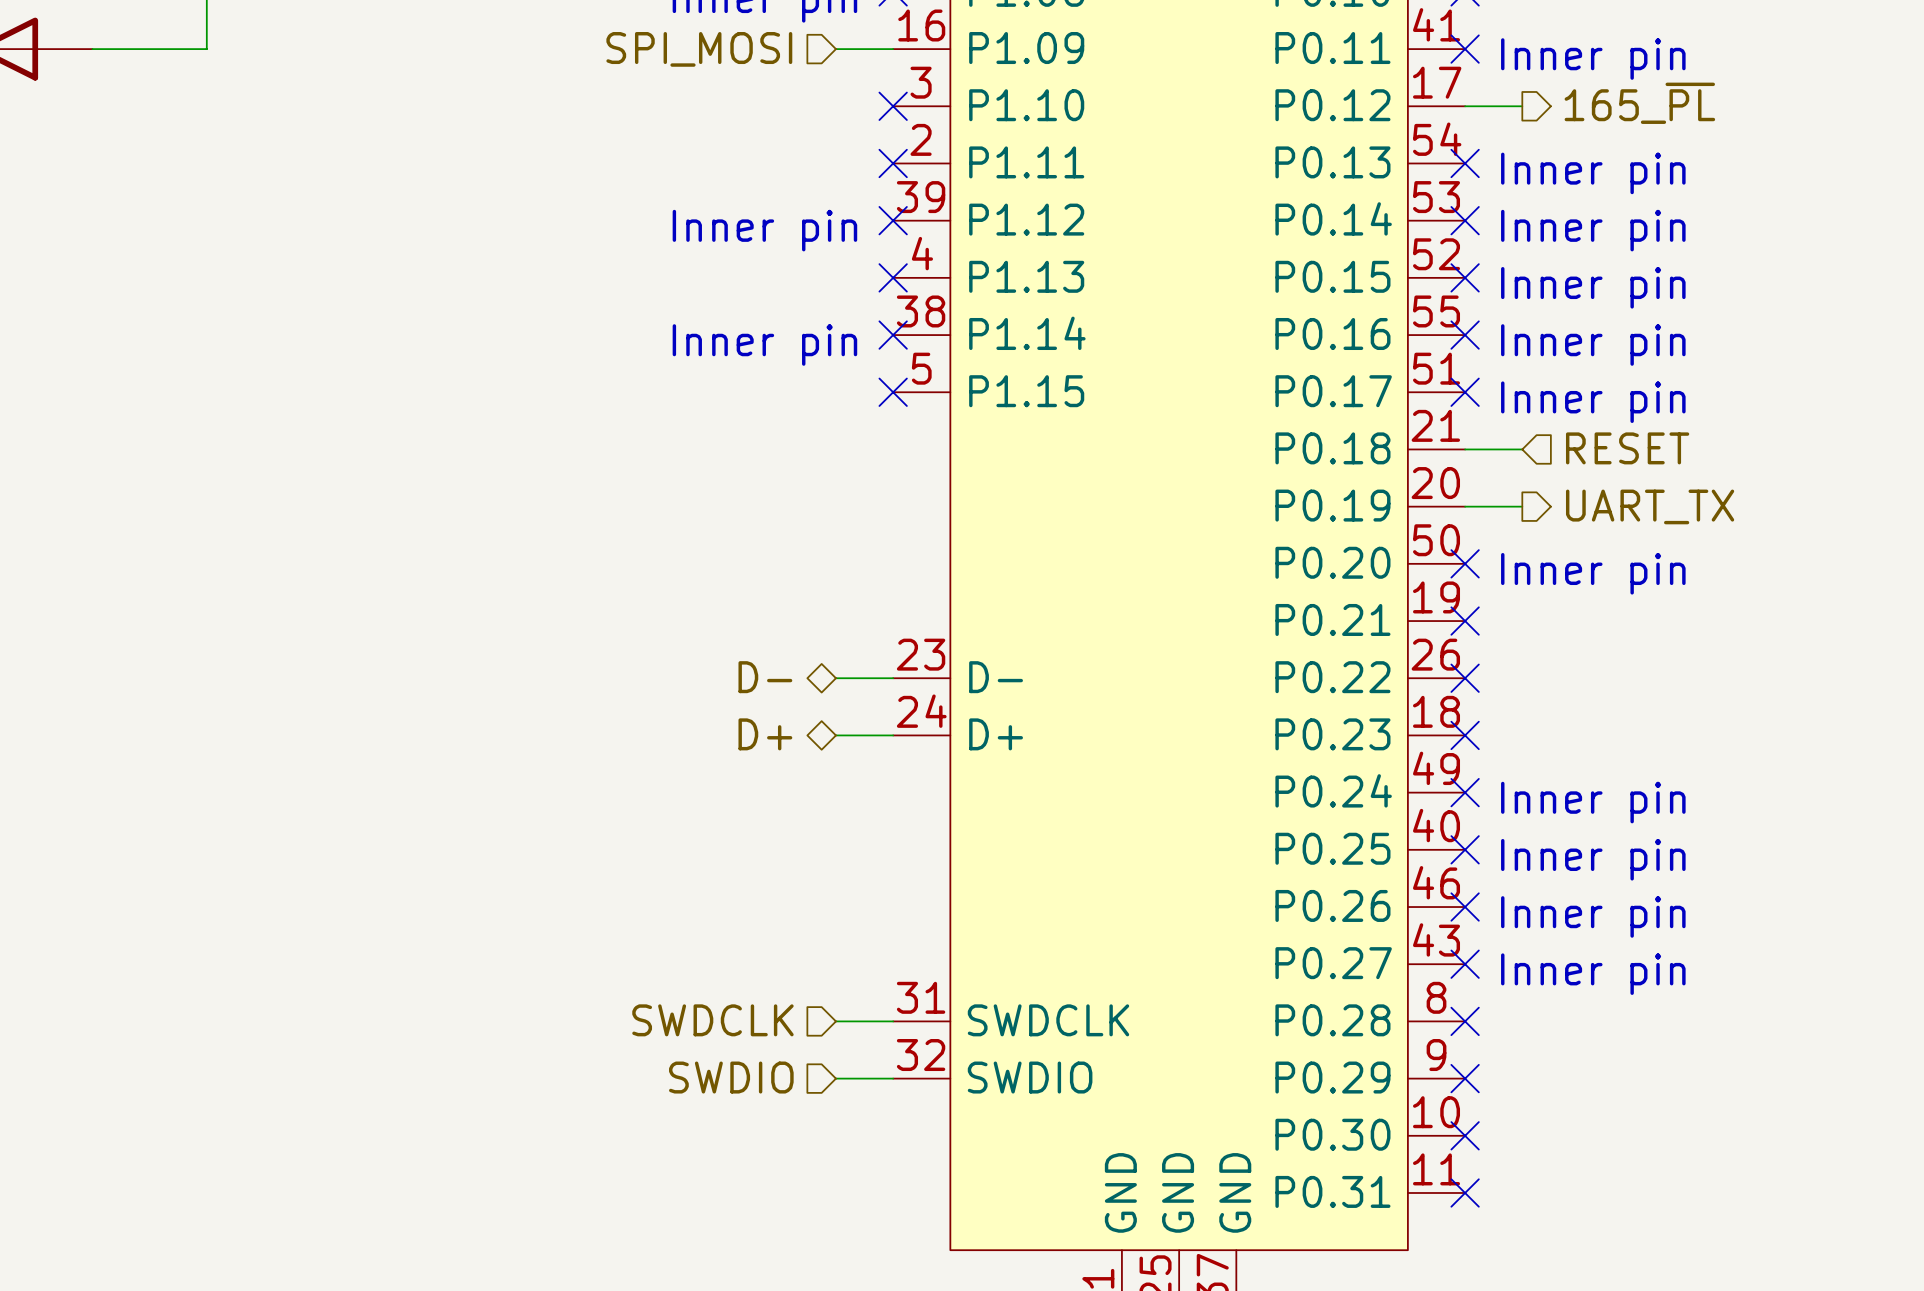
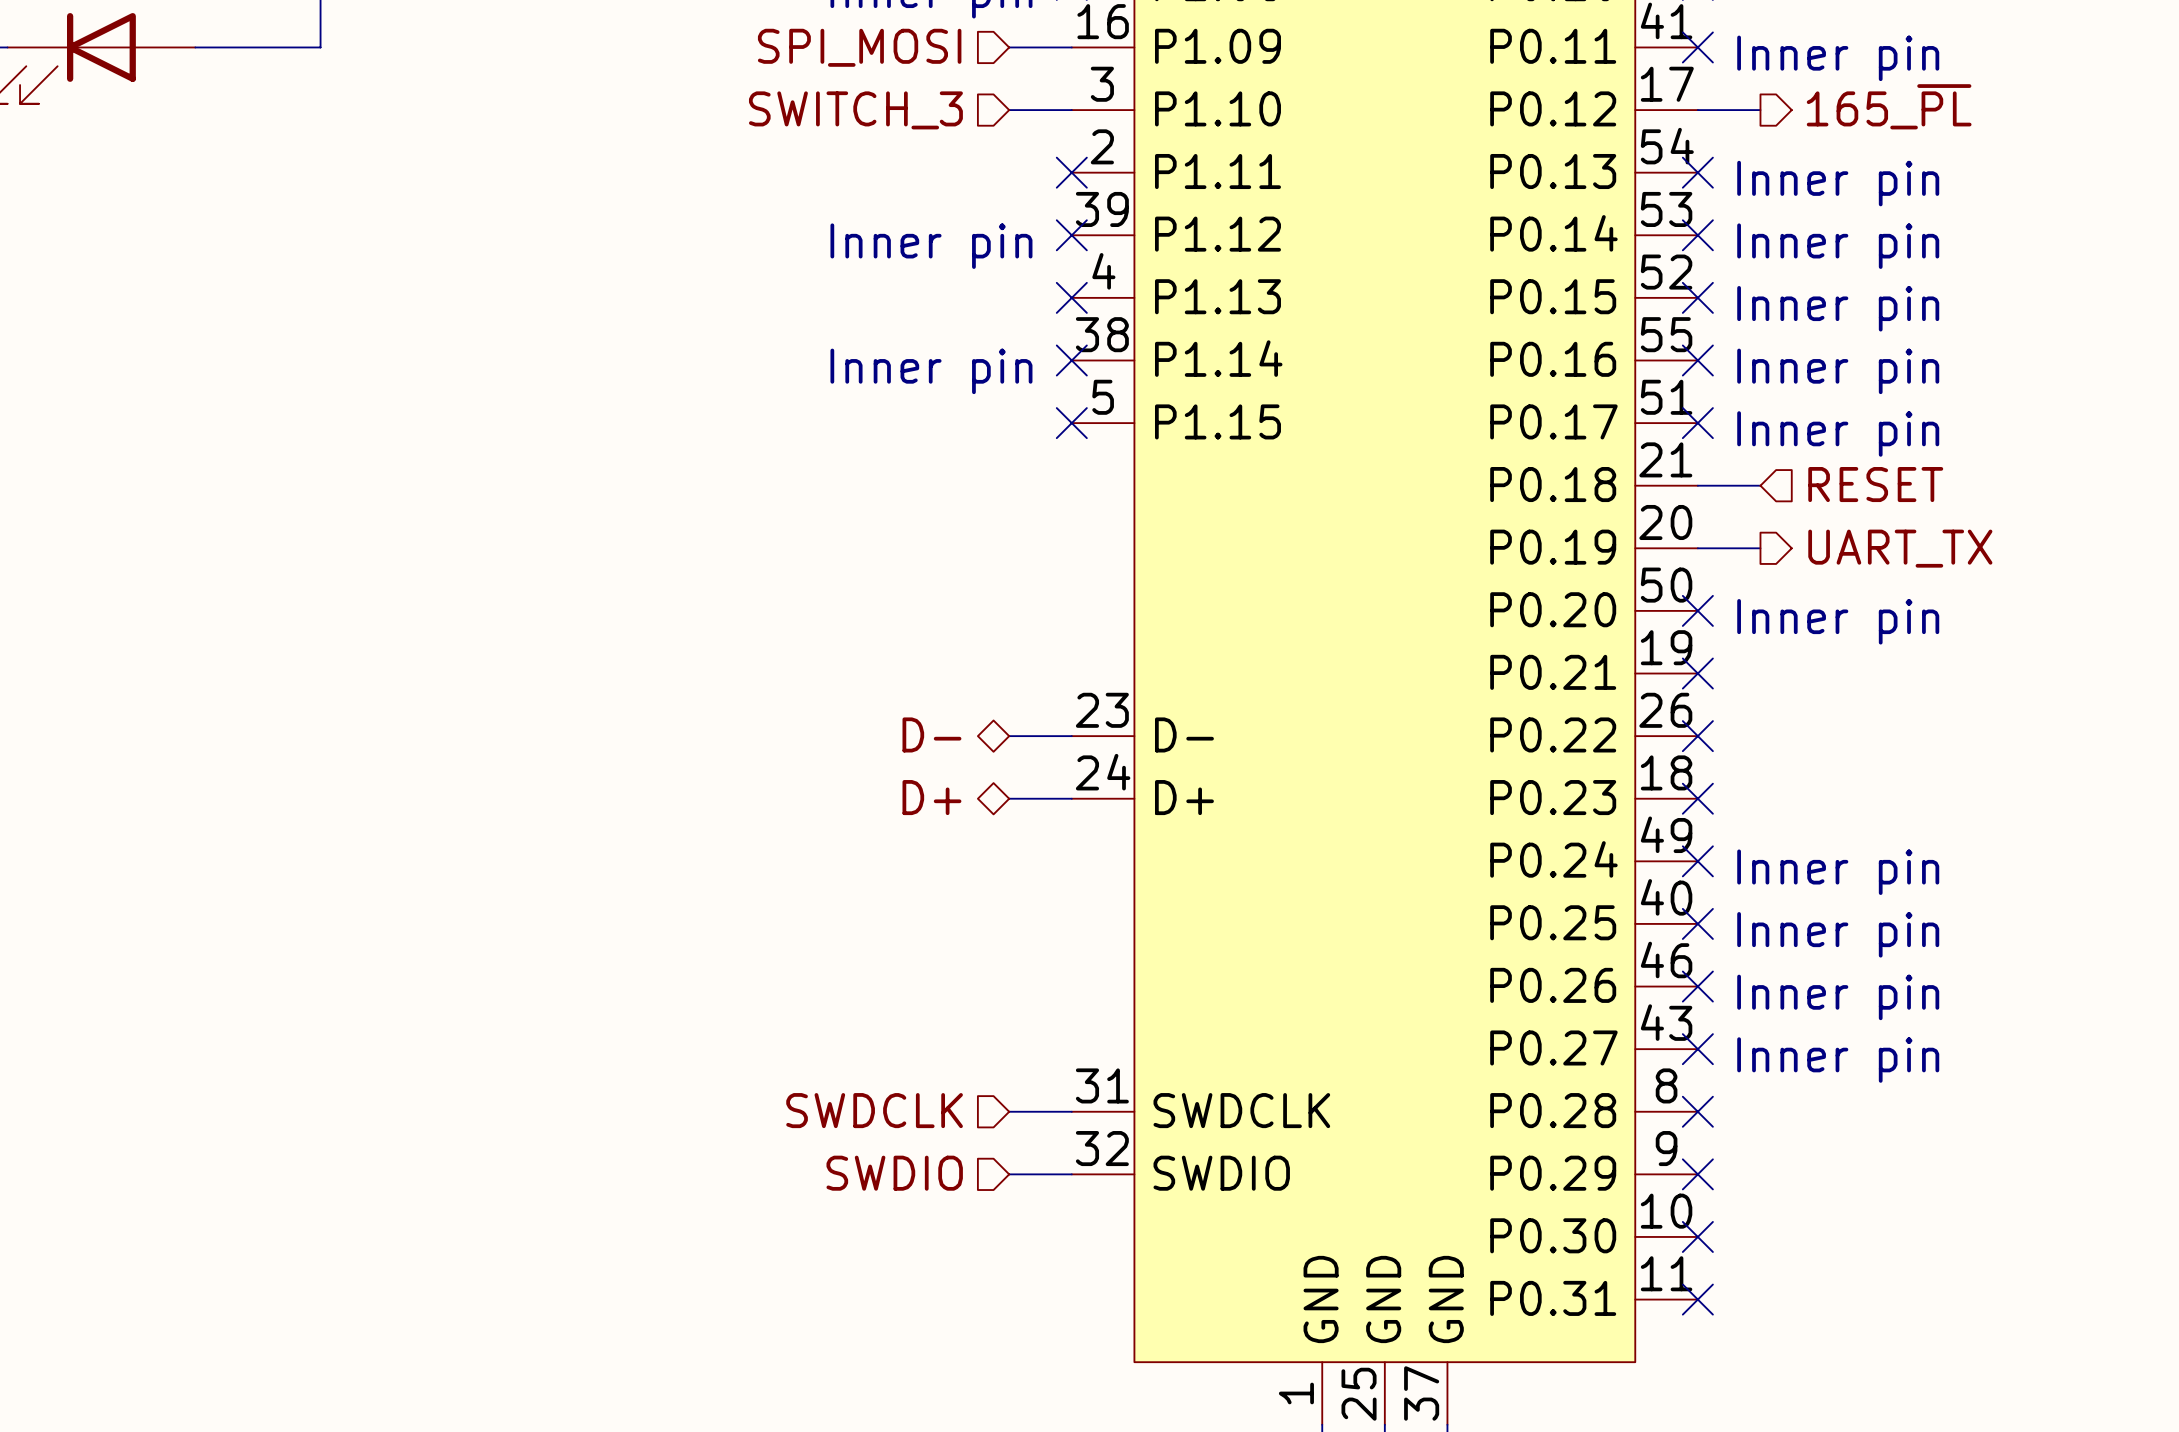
hierarchical label: none -> SWITCH_3 (855, 110)
wire: none -> (1009, 110) (1071, 110)
no-connect mark: (893, 106) -> none

